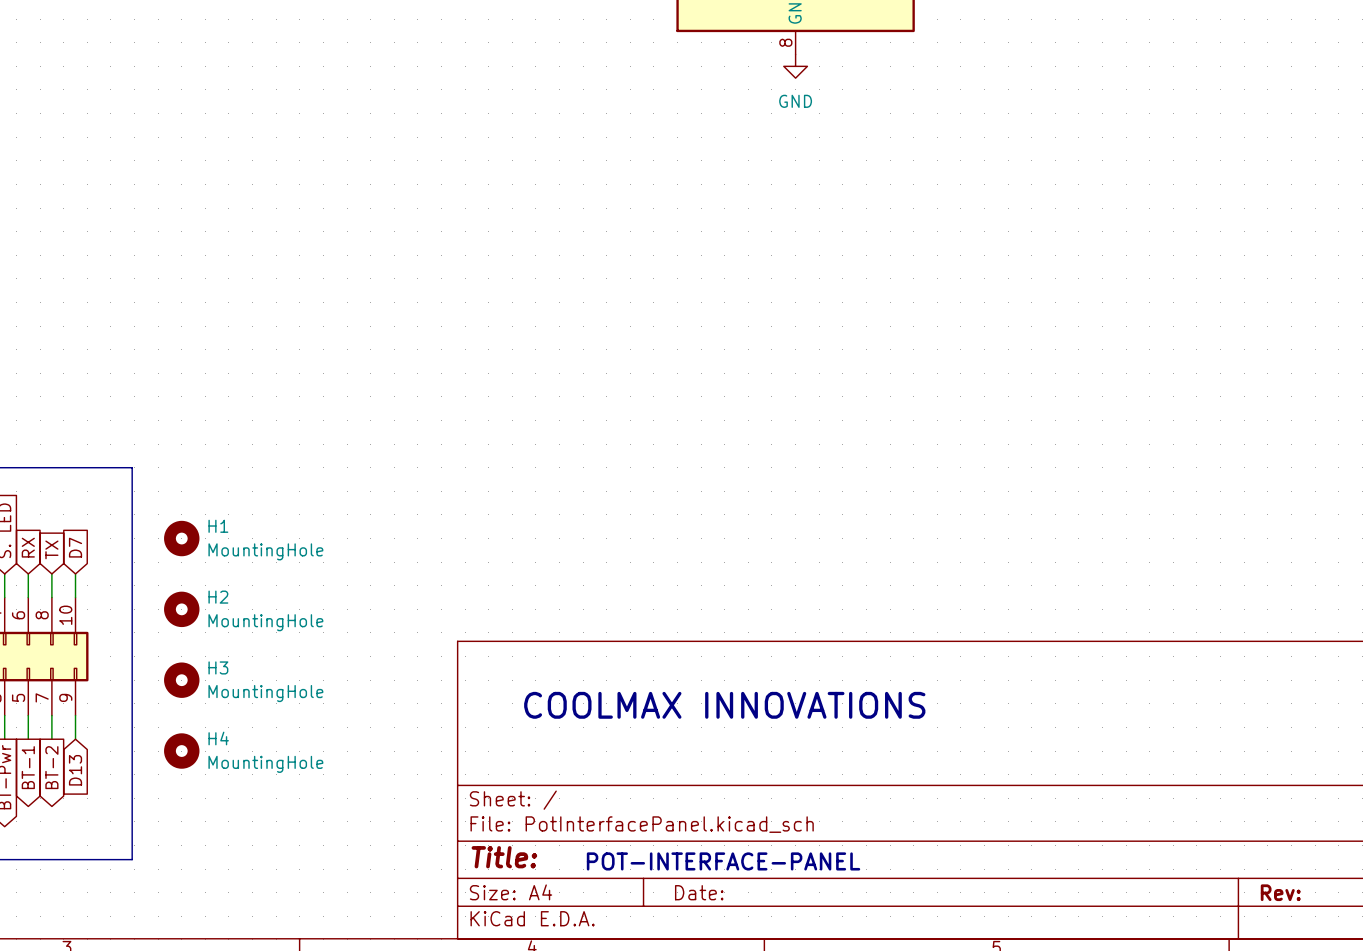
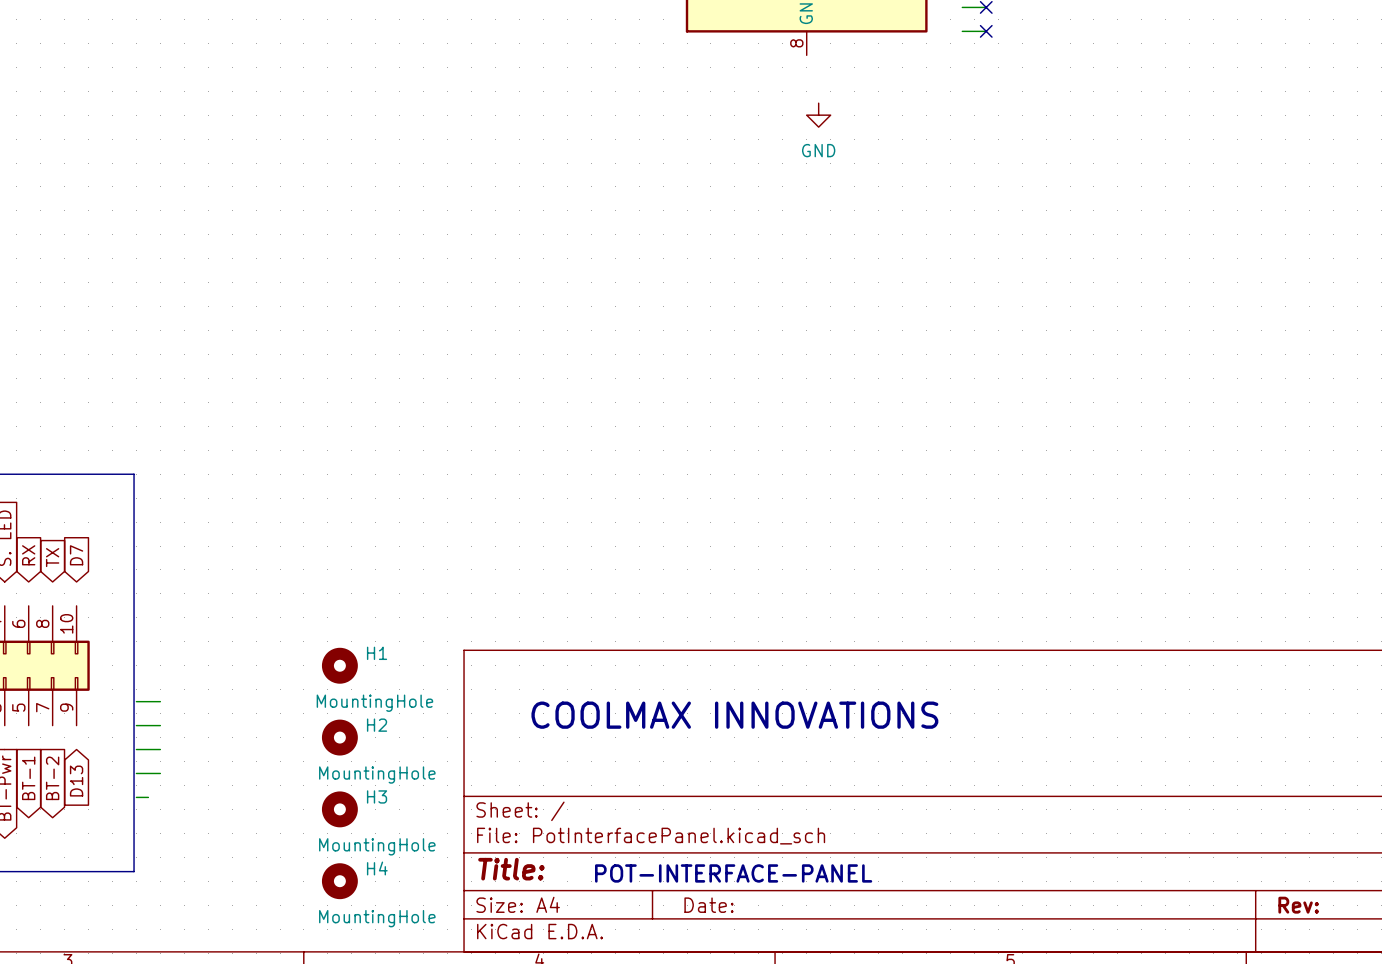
wire: none -> (962, 7) (986, 7)
no-connect mark: none -> (986, 7)
wire: none -> (962, 31) (986, 31)
no-connect mark: none -> (986, 31)
power symbol position: GND (795, 66) -> GND (818, 115)
H1 position: (181, 538) -> (339, 665)
H1 value position: MountingHole (265, 551) -> MountingHole (374, 703)
wire: (4, 573) (4, 597) -> none
wire: (28, 573) (28, 597) -> none
wire: (51, 573) (51, 597) -> none
wire: (75, 573) (75, 597) -> none
H2 position: (181, 609) -> (339, 737)
H2 value position: MountingHole (265, 622) -> MountingHole (377, 775)
H3 position: (181, 680) -> (339, 809)
wire: none -> (136, 701) (160, 701)
H3 value position: MountingHole (265, 693) -> MountingHole (377, 846)
wire: (4, 715) (4, 739) -> none
wire: (28, 715) (28, 739) -> none
wire: (51, 715) (51, 739) -> none
wire: (75, 715) (75, 739) -> none
wire: none -> (136, 725) (160, 725)
wire: none -> (136, 749) (160, 749)
H4 position: (181, 751) -> (339, 881)
wire: none -> (136, 773) (160, 773)
H4 value position: MountingHole (265, 764) -> MountingHole (377, 918)
wire: none -> (136, 797) (148, 797)

